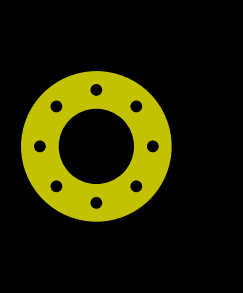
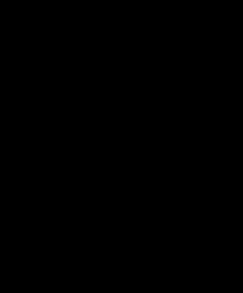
part: (96, 146) -> none

